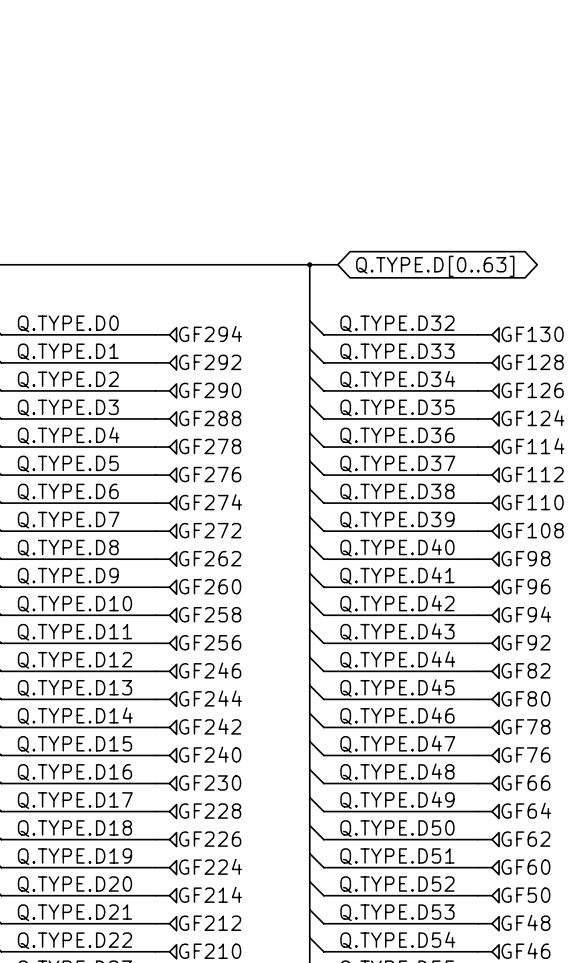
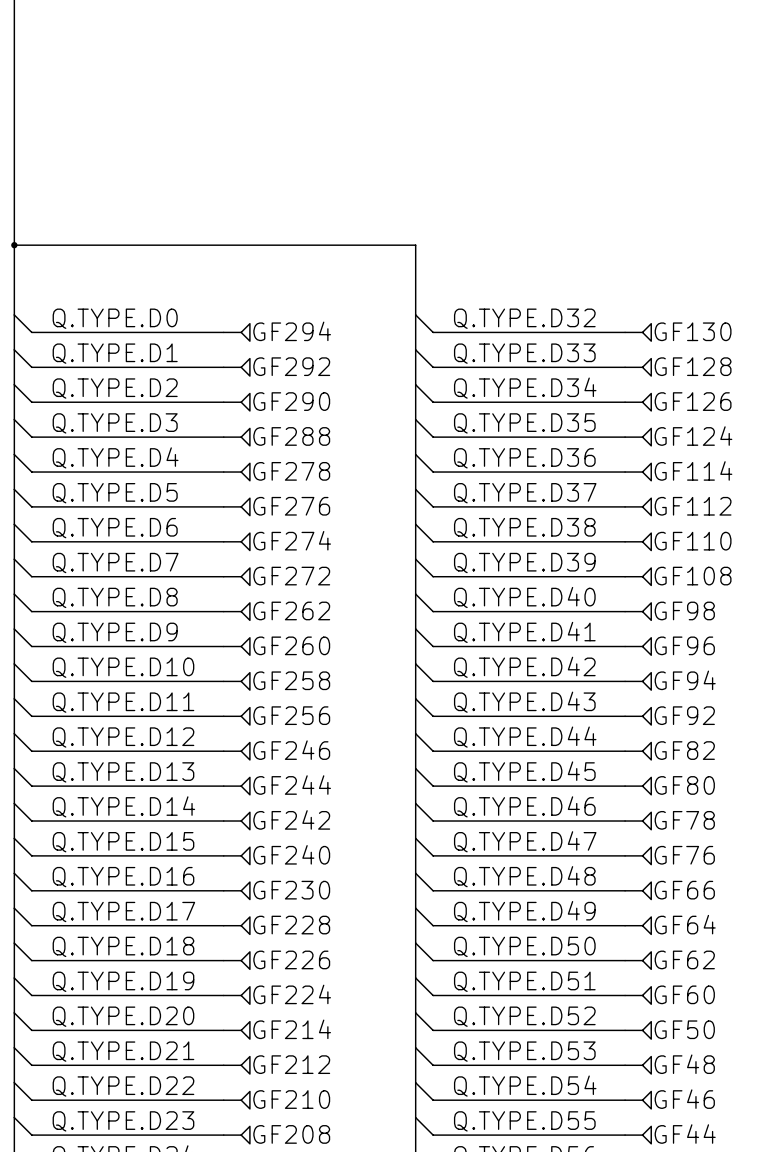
bus: (309, 264) (337, 264) -> none
junction: (309, 264) -> none
global label: Q.TYPE.D[0..63] (435, 266) -> none

